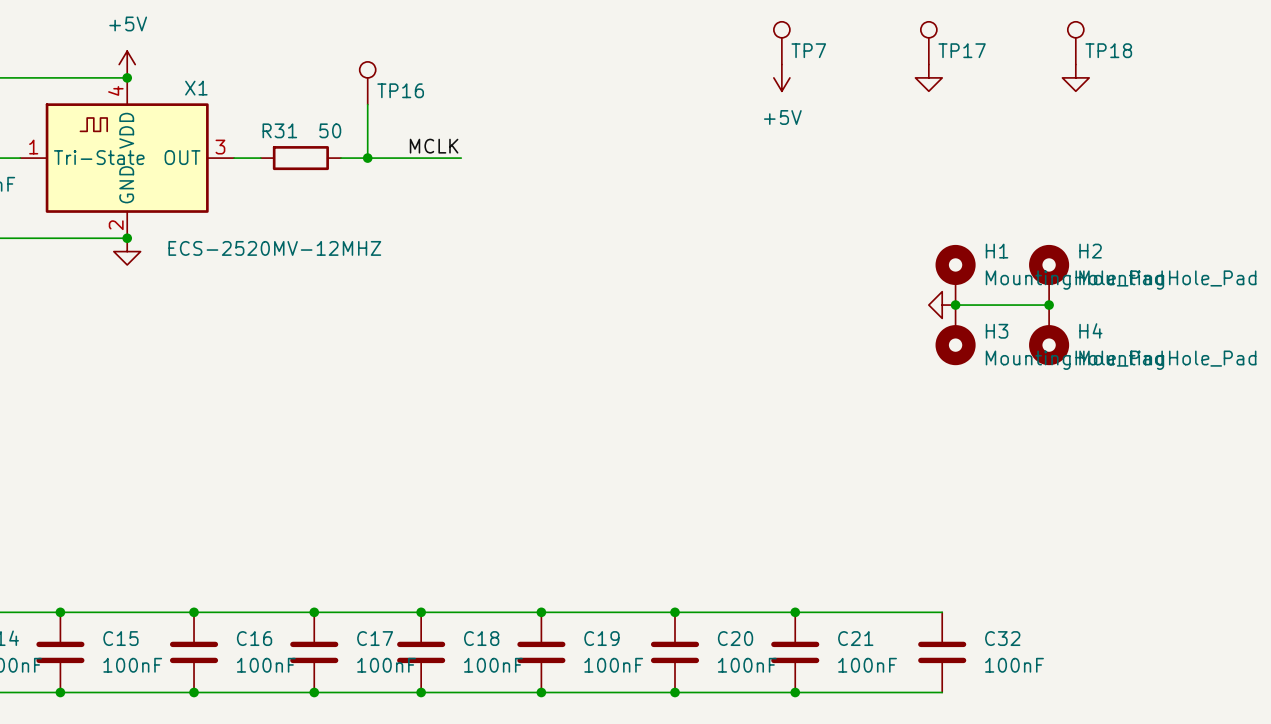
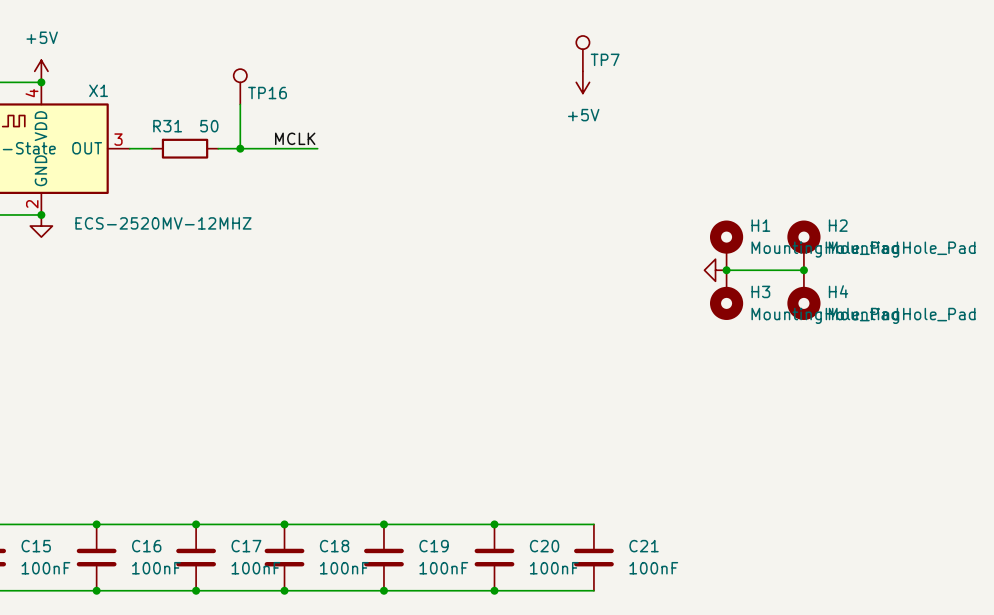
TP17: (928, 43) -> none
TP18: (1075, 43) -> none
power symbol: (928, 77) -> none
power symbol: (1075, 77) -> none
wire: (795, 612) (942, 612) -> none
junction: (795, 612) -> none
C32: 100nF (942, 652) -> none
wire: (795, 692) (942, 692) -> none
junction: (795, 692) -> none

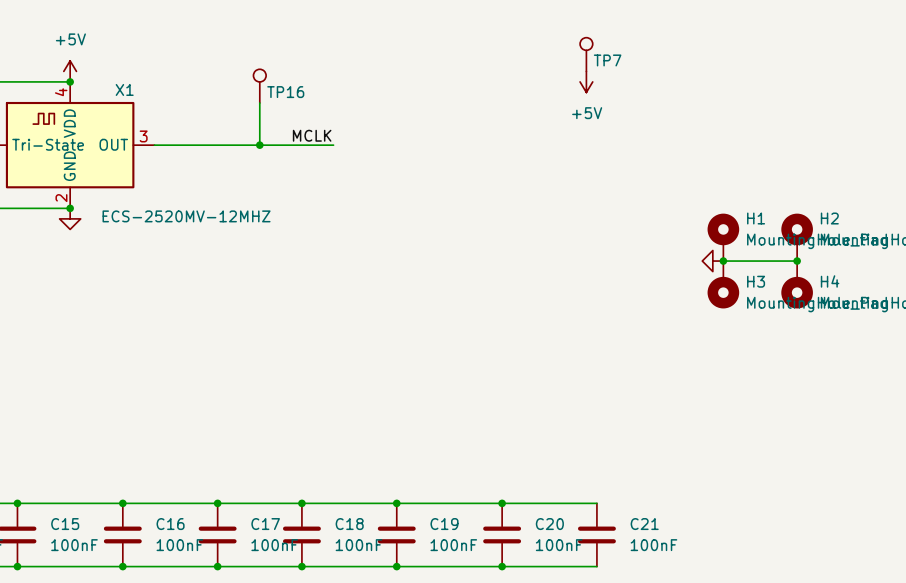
wire: none -> (175, 145) (238, 145)
R31: 50 (185, 148) -> none

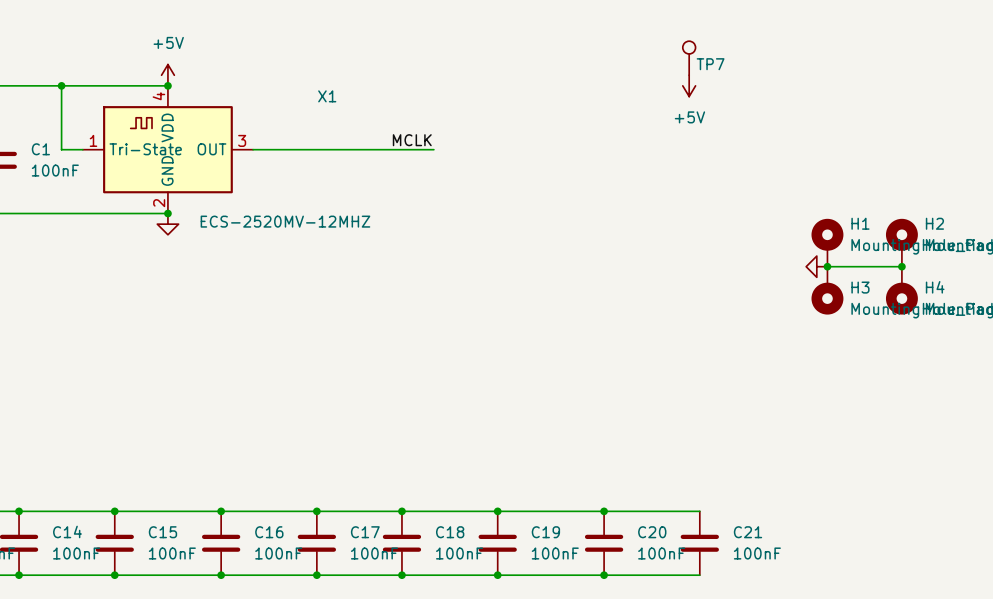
TP16: (259, 86) -> none
X1 name position: X1 (124, 89) -> X1 (327, 96)
wire: (259, 103) (259, 145) -> none
junction: (259, 145) -> none

